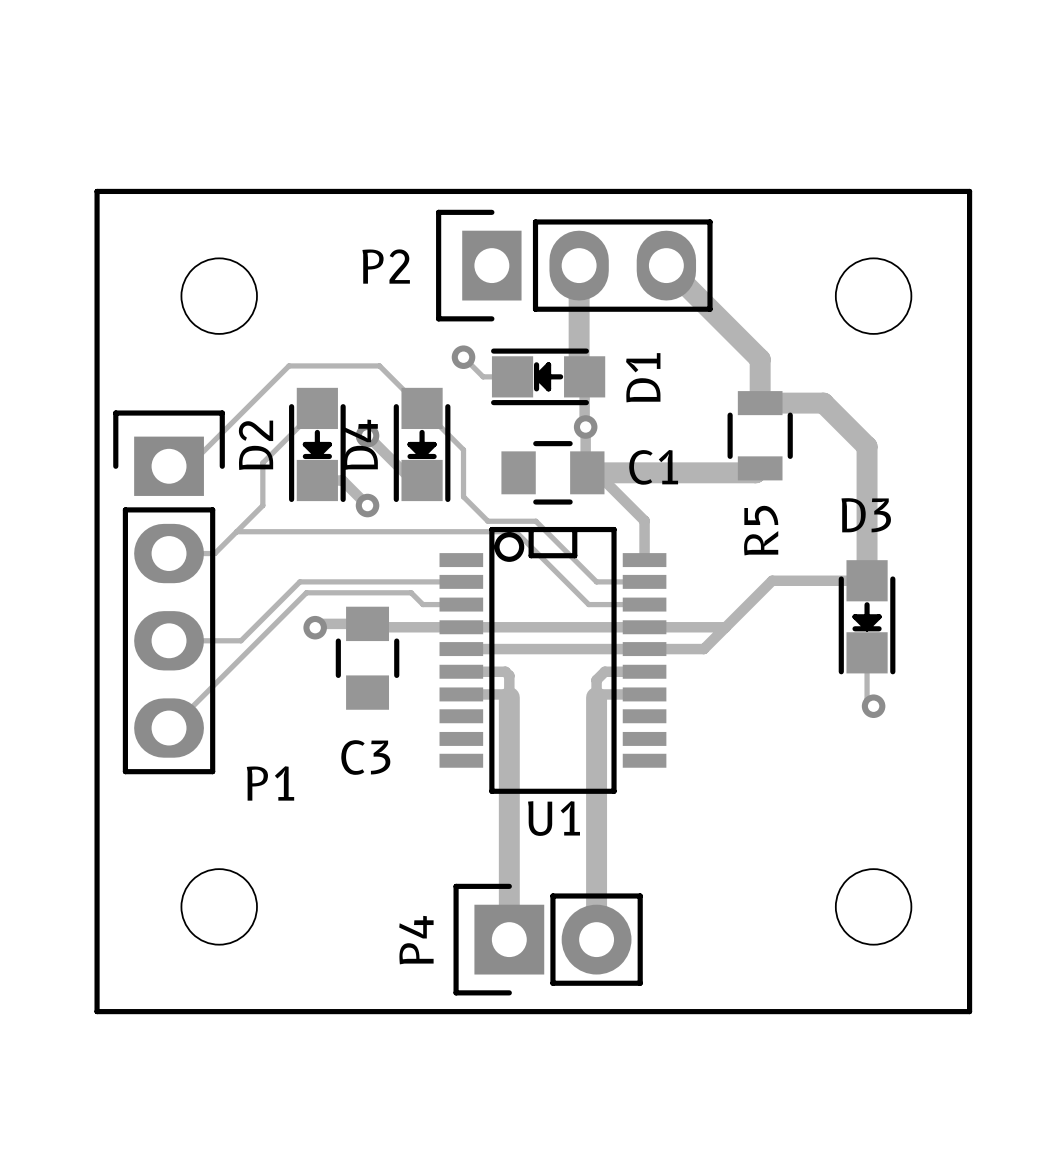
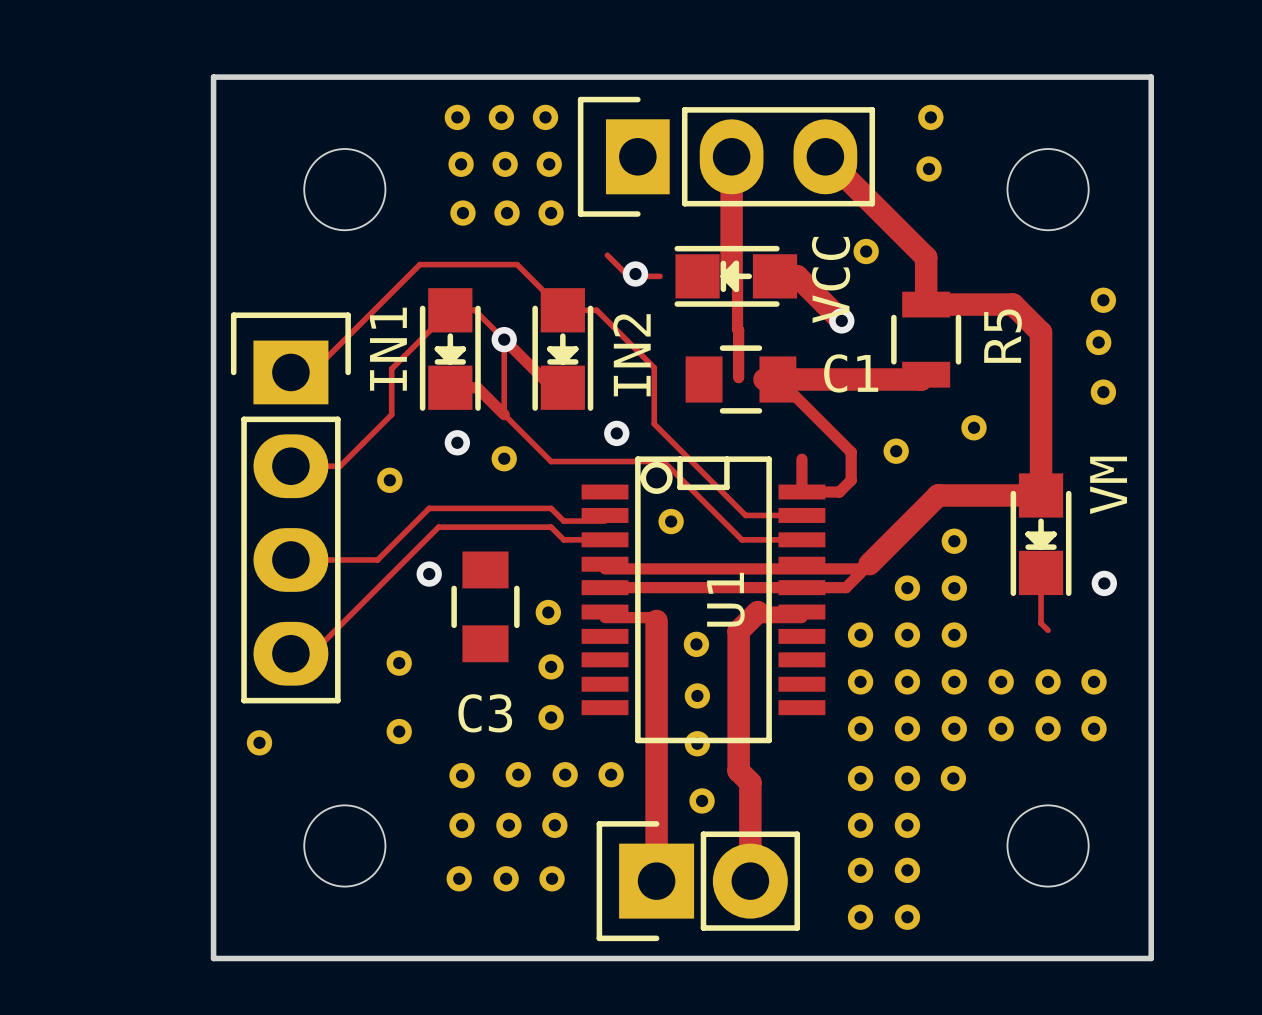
part: none -> (457, 117)
part: none -> (501, 117)
part: none -> (545, 117)
part: none -> (930, 117)
P2 name: P2 (386, 266) -> none
part: none -> (461, 164)
part: none -> (505, 164)
part: none -> (549, 164)
part: none -> (928, 168)
part: none -> (462, 213)
part: none -> (507, 213)
part: none -> (551, 213)
part: none -> (866, 251)
via position: (463, 357) -> (635, 274)
D1: (548, 376) -> none
part: none -> (735, 276)
track: none -> (775, 276) (797, 276) (841, 320)
text: none -> VCC (831, 279)
part: none -> (1103, 300)
track: (823, 403) (867, 446) -> (994, 304) (1013, 304) (1041, 332) (1041, 351)
track: none -> (450, 310) (474, 310) (504, 339) (504, 414) (551, 461) (663, 461) (741, 539) (801, 539)
track: (422, 408) (463, 449) (463, 496) (487, 521) (535, 521) (596, 581) (644, 581) -> (562, 310) (596, 310) (654, 367) (654, 424) (745, 515) (801, 515)
via: none -> (841, 320)
via: (585, 427) -> none
part: none -> (1098, 342)
D4 name: D4 (360, 444) -> none
D2 name: D2 (256, 445) -> none
text: none -> IN1 (388, 349)
text: none -> IN2 (631, 355)
C1 position: (552, 472) -> (740, 379)
track: (587, 472) (596, 472) (644, 520) (644, 546) -> none
track: none -> (778, 379) (851, 452) (851, 480) (839, 492) (801, 492) (801, 473)
part: none -> (1103, 392)
via: (367, 505) -> none
D3 name: D3 (866, 515) -> none
part: none -> (973, 427)
via: none -> (616, 433)
R5 name position: R5 (761, 530) -> R5 (1002, 336)
track: (236, 531) (515, 531) (588, 604) (644, 604) -> none
via: none -> (457, 442)
part: none -> (896, 451)
part: none -> (504, 458)
part: none -> (389, 480)
text: none -> VM (1108, 485)
track: (772, 580) (725, 627) (370, 627) (367, 623) (319, 623) (315, 627) -> (939, 495) (846, 587) (605, 587)
track width: thin (772, 580) (867, 580) -> thick (939, 495) (1041, 495)
track: (461, 581) (299, 581) (241, 640) -> none
track: (306, 592) (171, 728) -> (438, 508) (429, 508) (377, 559) (368, 559)
part: none -> (671, 521)
track: none -> (605, 539) (563, 539) (551, 527) (438, 527) (312, 653) (293, 653)
part: none -> (954, 541)
via position: (315, 627) -> (429, 574)
C3 position: (367, 658) -> (485, 606)
U1 position: (552, 660) -> (703, 599)
part: none -> (907, 588)
part: none -> (954, 588)
track: (461, 671) (505, 671) (509, 675) (509, 697) -> none
track: (644, 671) (604, 671) (596, 680) (596, 848) -> (801, 612) (757, 612) (738, 631) (738, 770) (750, 782)
part: none -> (548, 612)
via position: (873, 706) -> (1104, 583)
part: none -> (860, 635)
part: none -> (907, 635)
part: none -> (954, 635)
part: none -> (696, 644)
part: none -> (399, 663)
part: none -> (551, 666)
part: none -> (860, 681)
part: none -> (907, 681)
part: none -> (954, 681)
part: none -> (1001, 681)
part: none -> (1048, 681)
part: none -> (1094, 681)
part: none -> (697, 695)
P1 name: P1 (270, 783) -> none
part: none -> (551, 717)
part: none -> (860, 728)
part: none -> (907, 728)
part: none -> (954, 728)
part: none -> (1001, 728)
part: none -> (1048, 728)
part: none -> (1094, 728)
part: none -> (399, 731)
part: none -> (259, 742)
part: none -> (697, 743)
U1 name rotation: 0° (554, 818) -> 90° counterclockwise (725, 599)
U1 name position: U1 (554, 818) -> U1 (725, 599)
part: none -> (518, 774)
part: none -> (565, 774)
part: none -> (611, 774)
part: none -> (462, 775)
part: none -> (860, 778)
part: none -> (907, 778)
part: none -> (953, 778)
part: none -> (702, 800)
part: none -> (462, 825)
part: none -> (508, 825)
part: none -> (554, 825)
part: none -> (860, 825)
part: none -> (907, 825)
part: none -> (860, 870)
part: none -> (907, 870)
part: none -> (459, 878)
part: none -> (506, 878)
part: none -> (552, 878)
P4 name: P4 (416, 940) -> none
part: none -> (860, 917)
part: none -> (907, 917)

